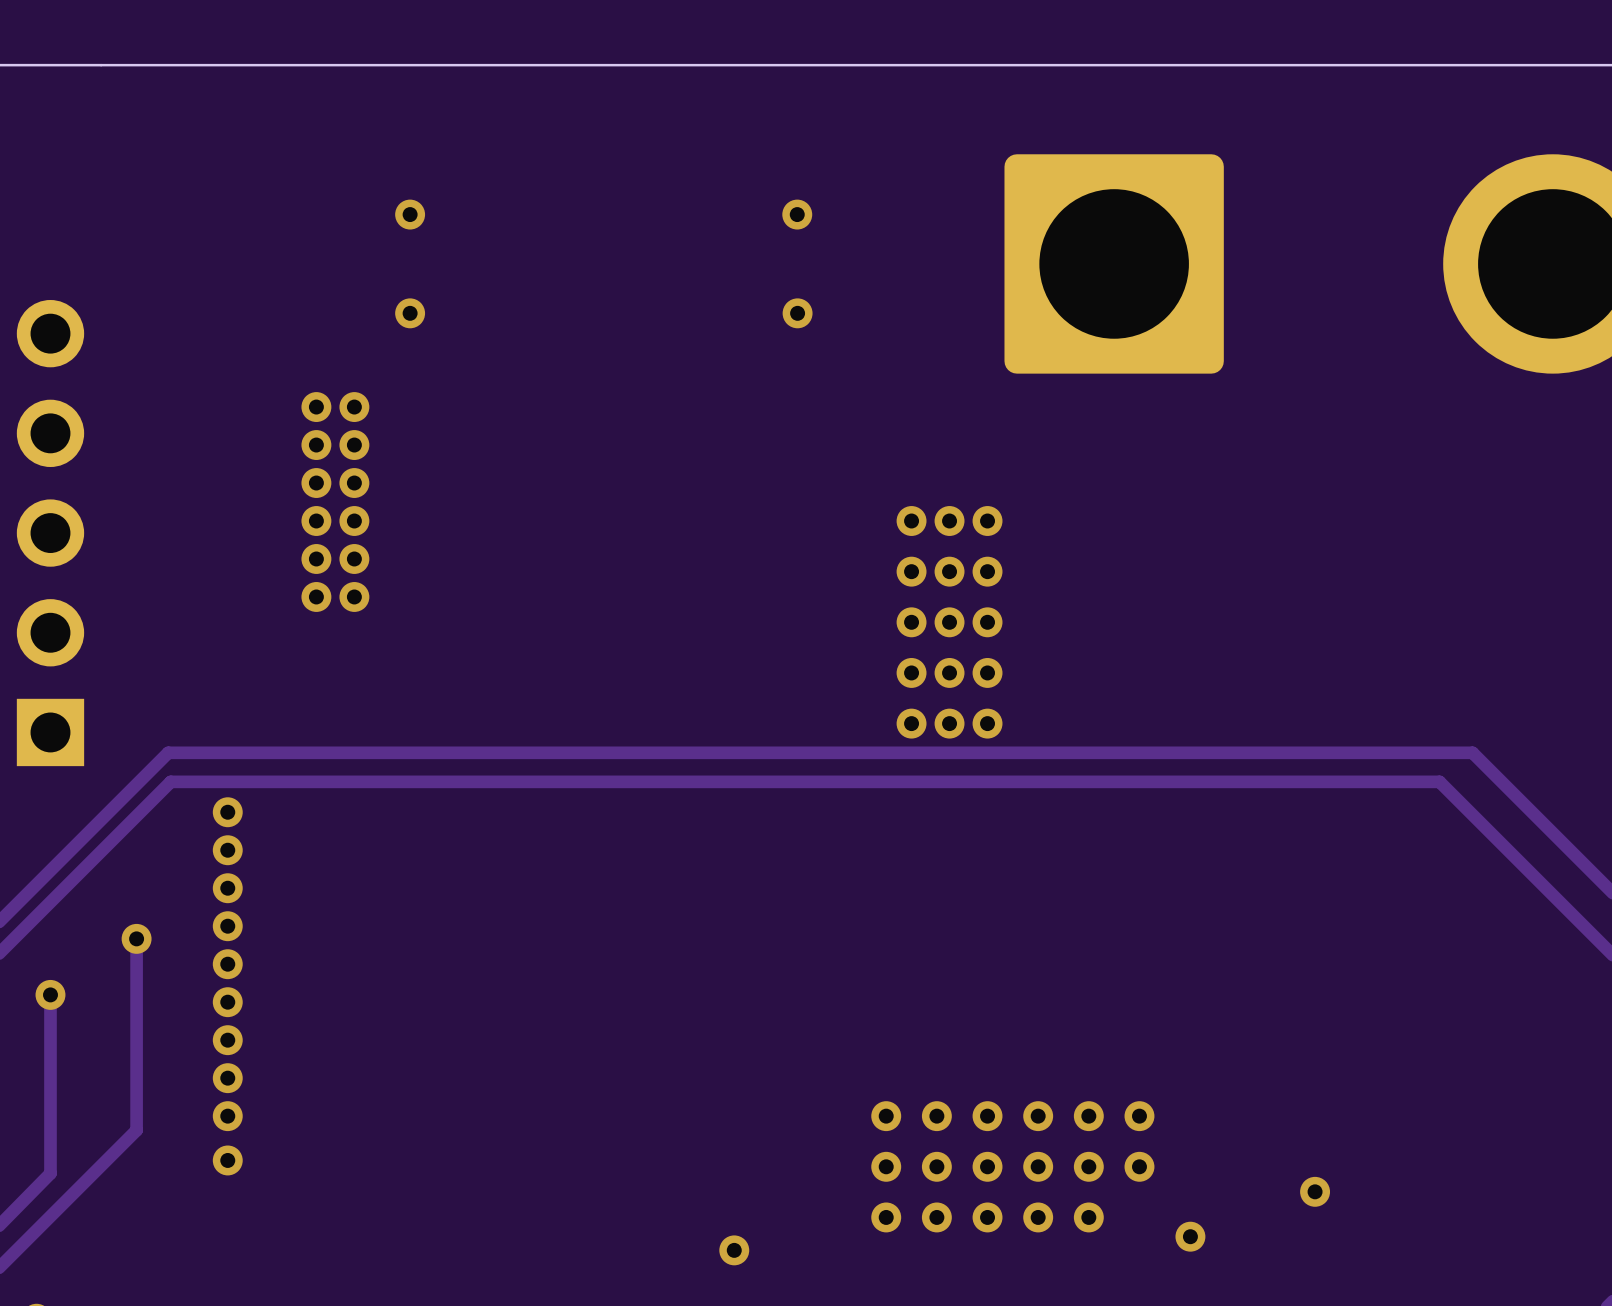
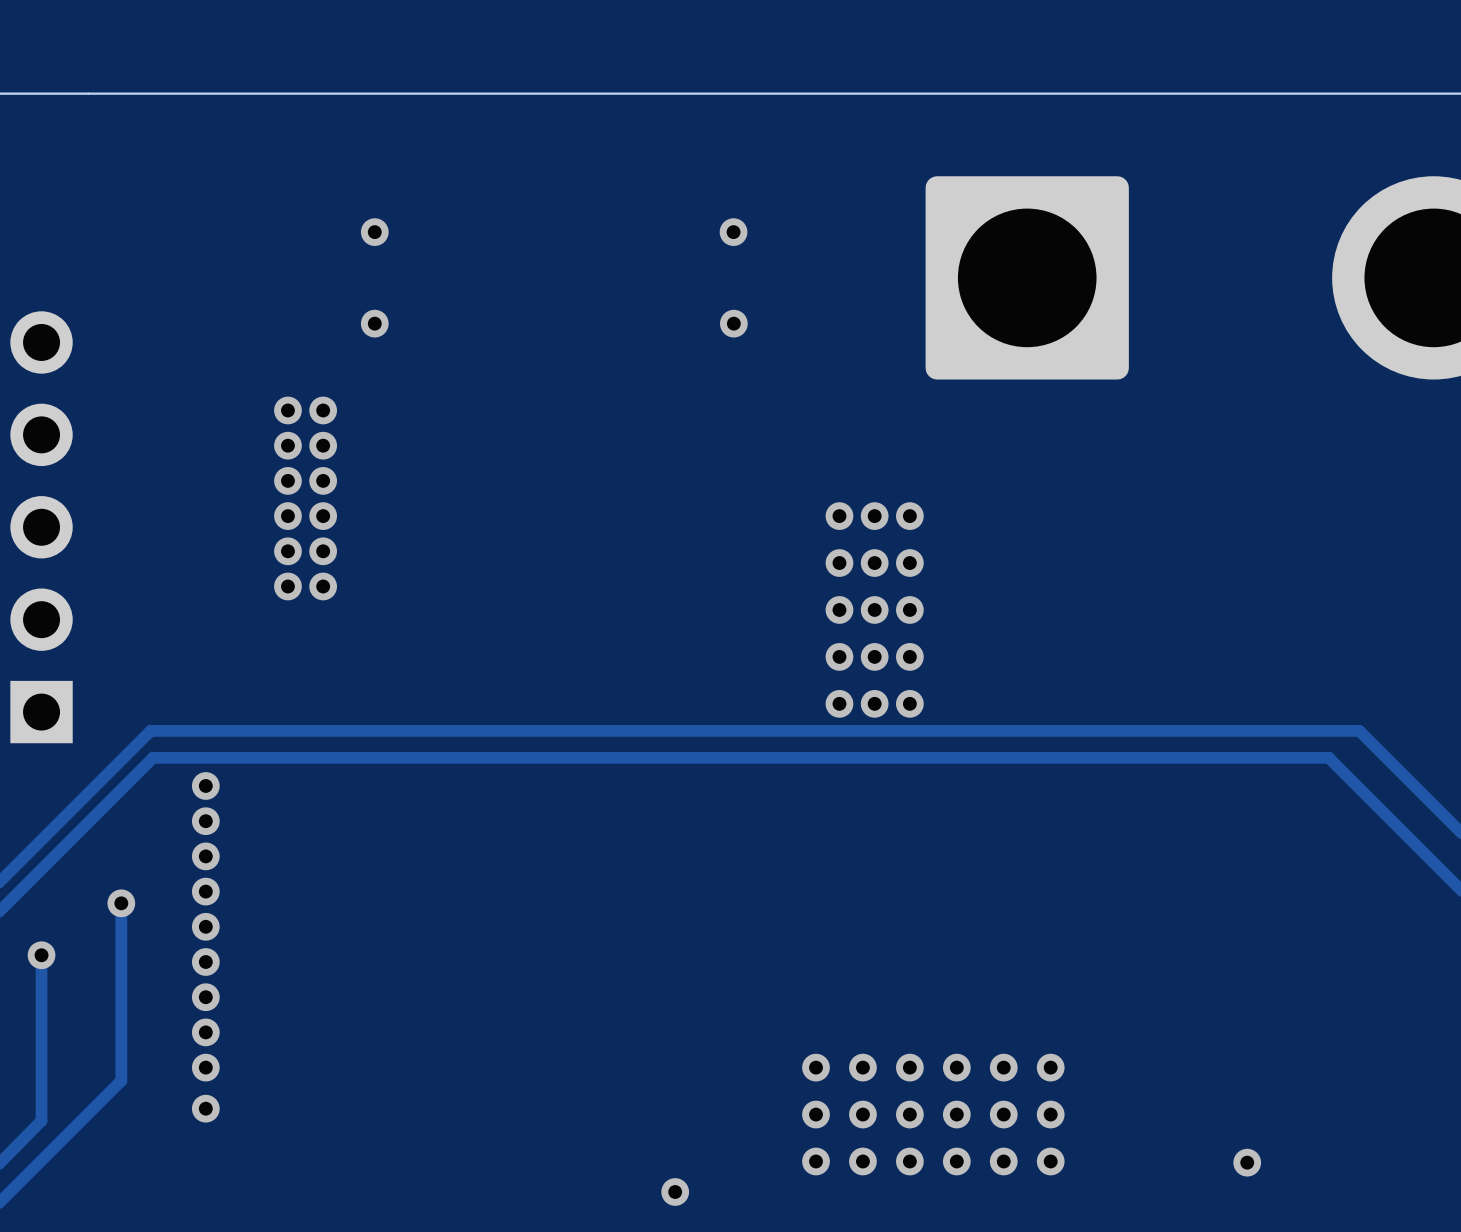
via position: (1315, 1191) -> (1247, 1162)
via position: (1190, 1236) -> (1050, 1161)

